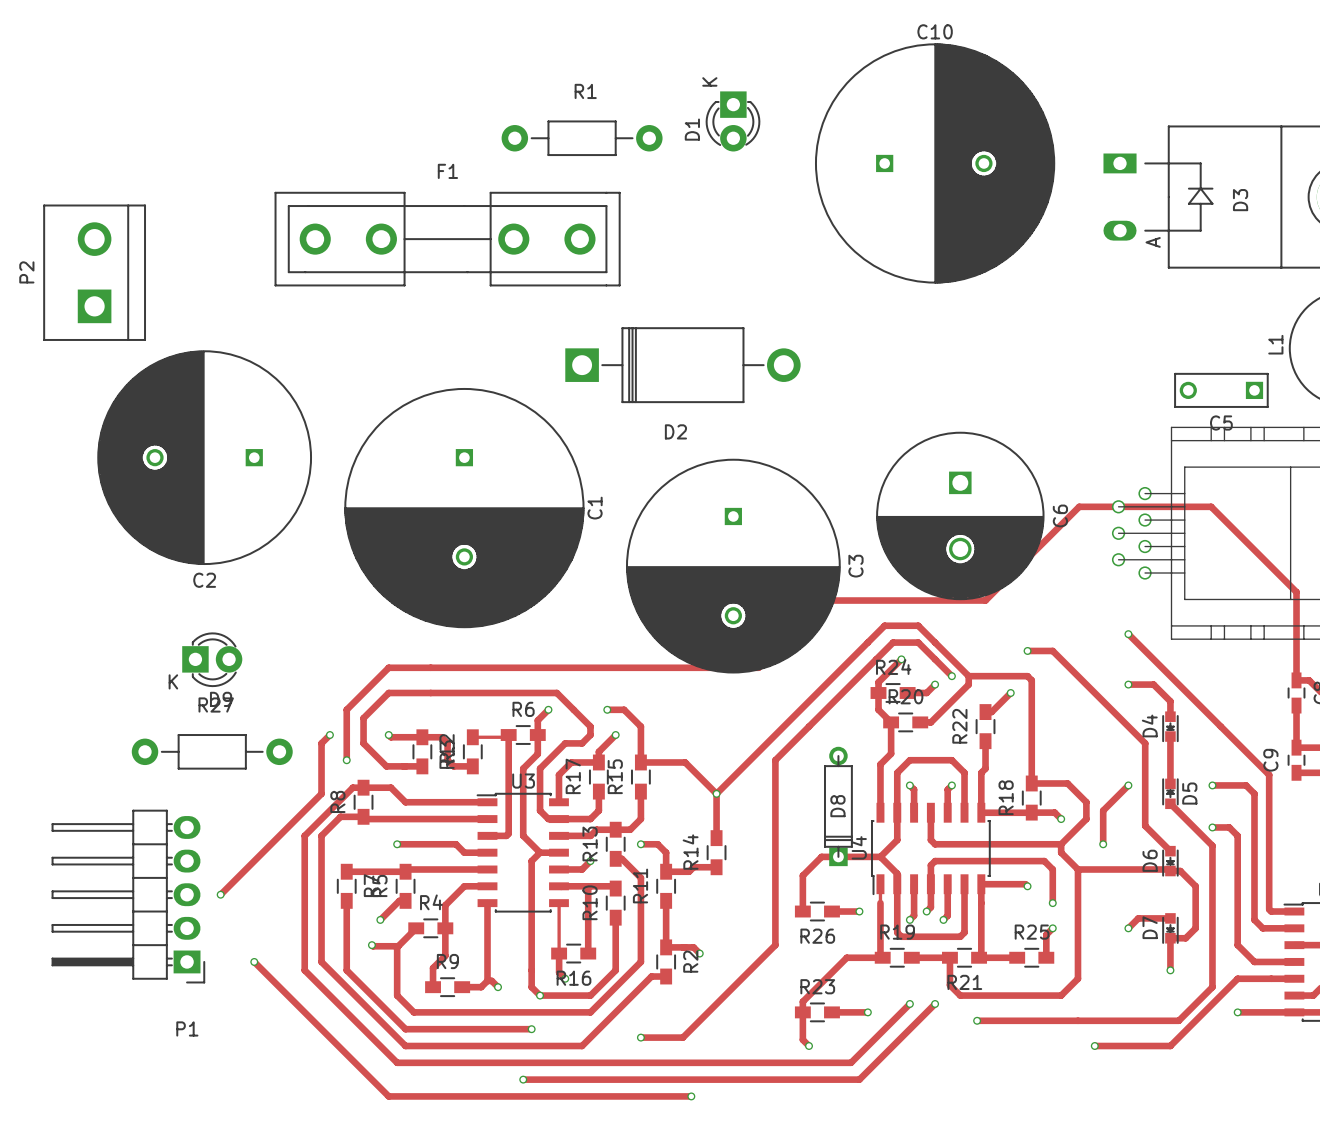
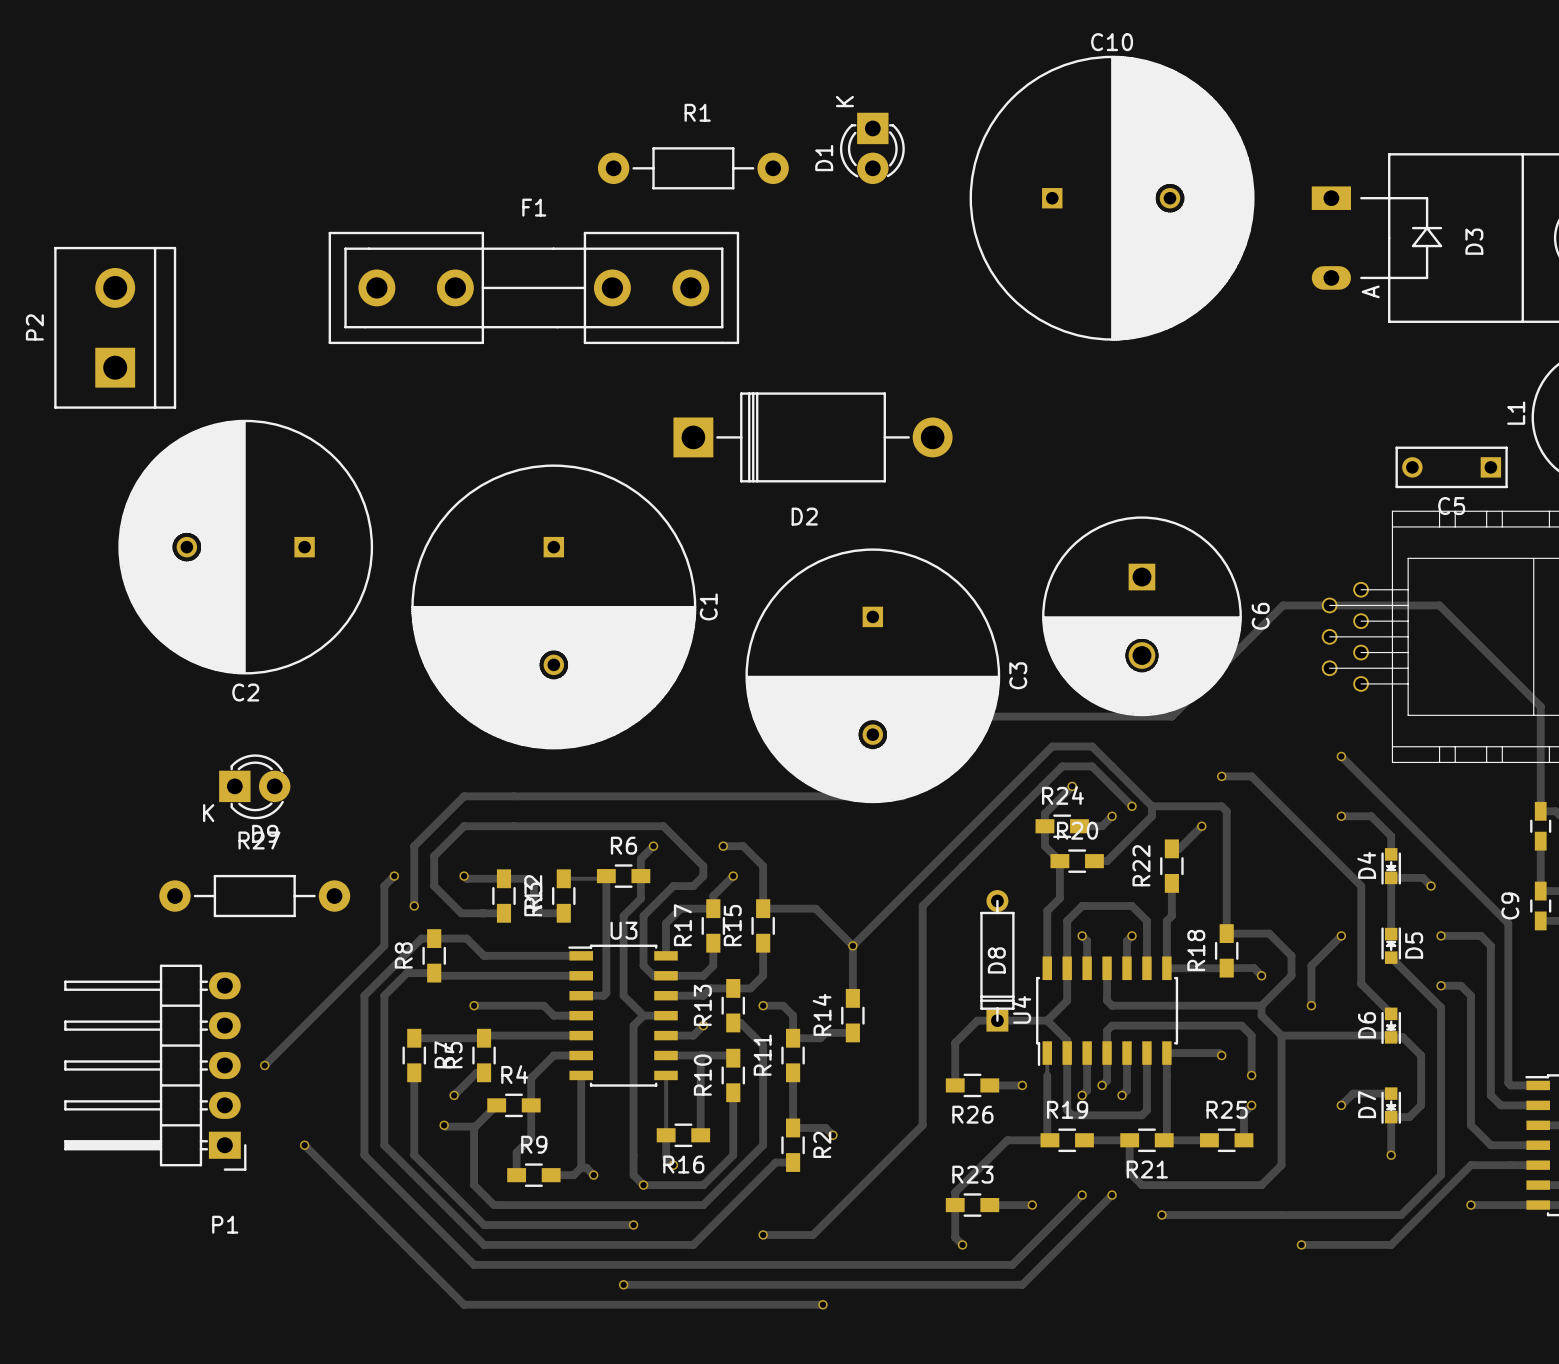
track: none -> (1391, 877) (1422, 877) (1431, 886)
via: none -> (1431, 886)

